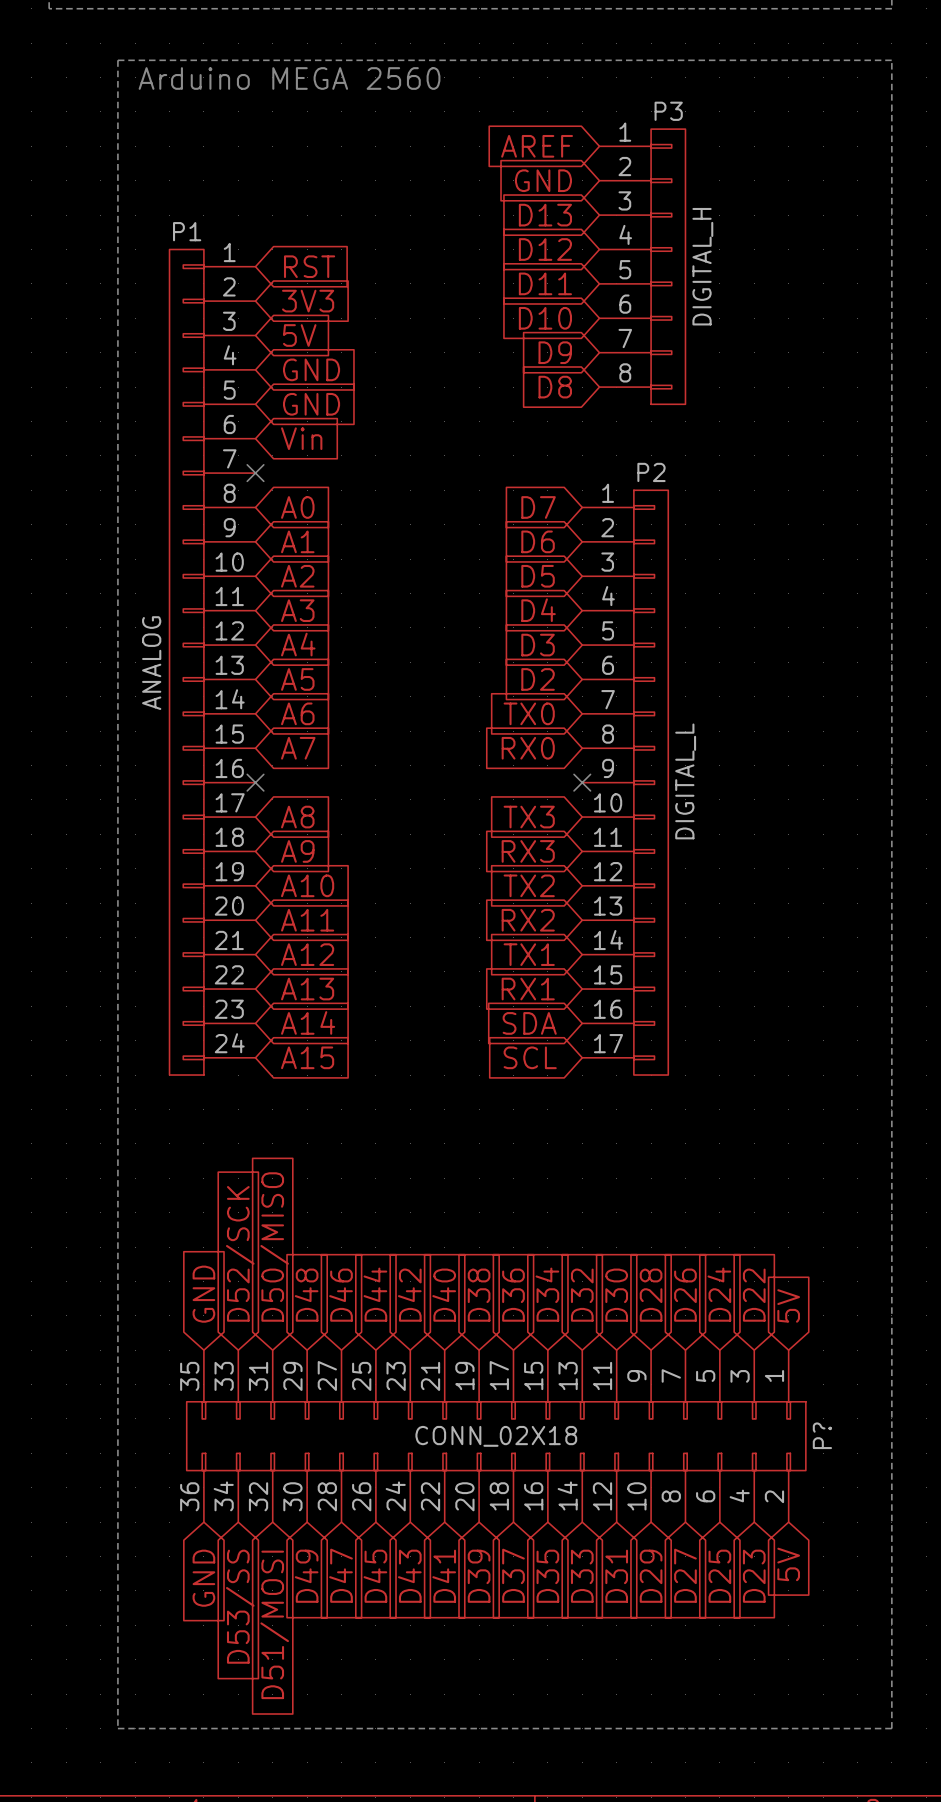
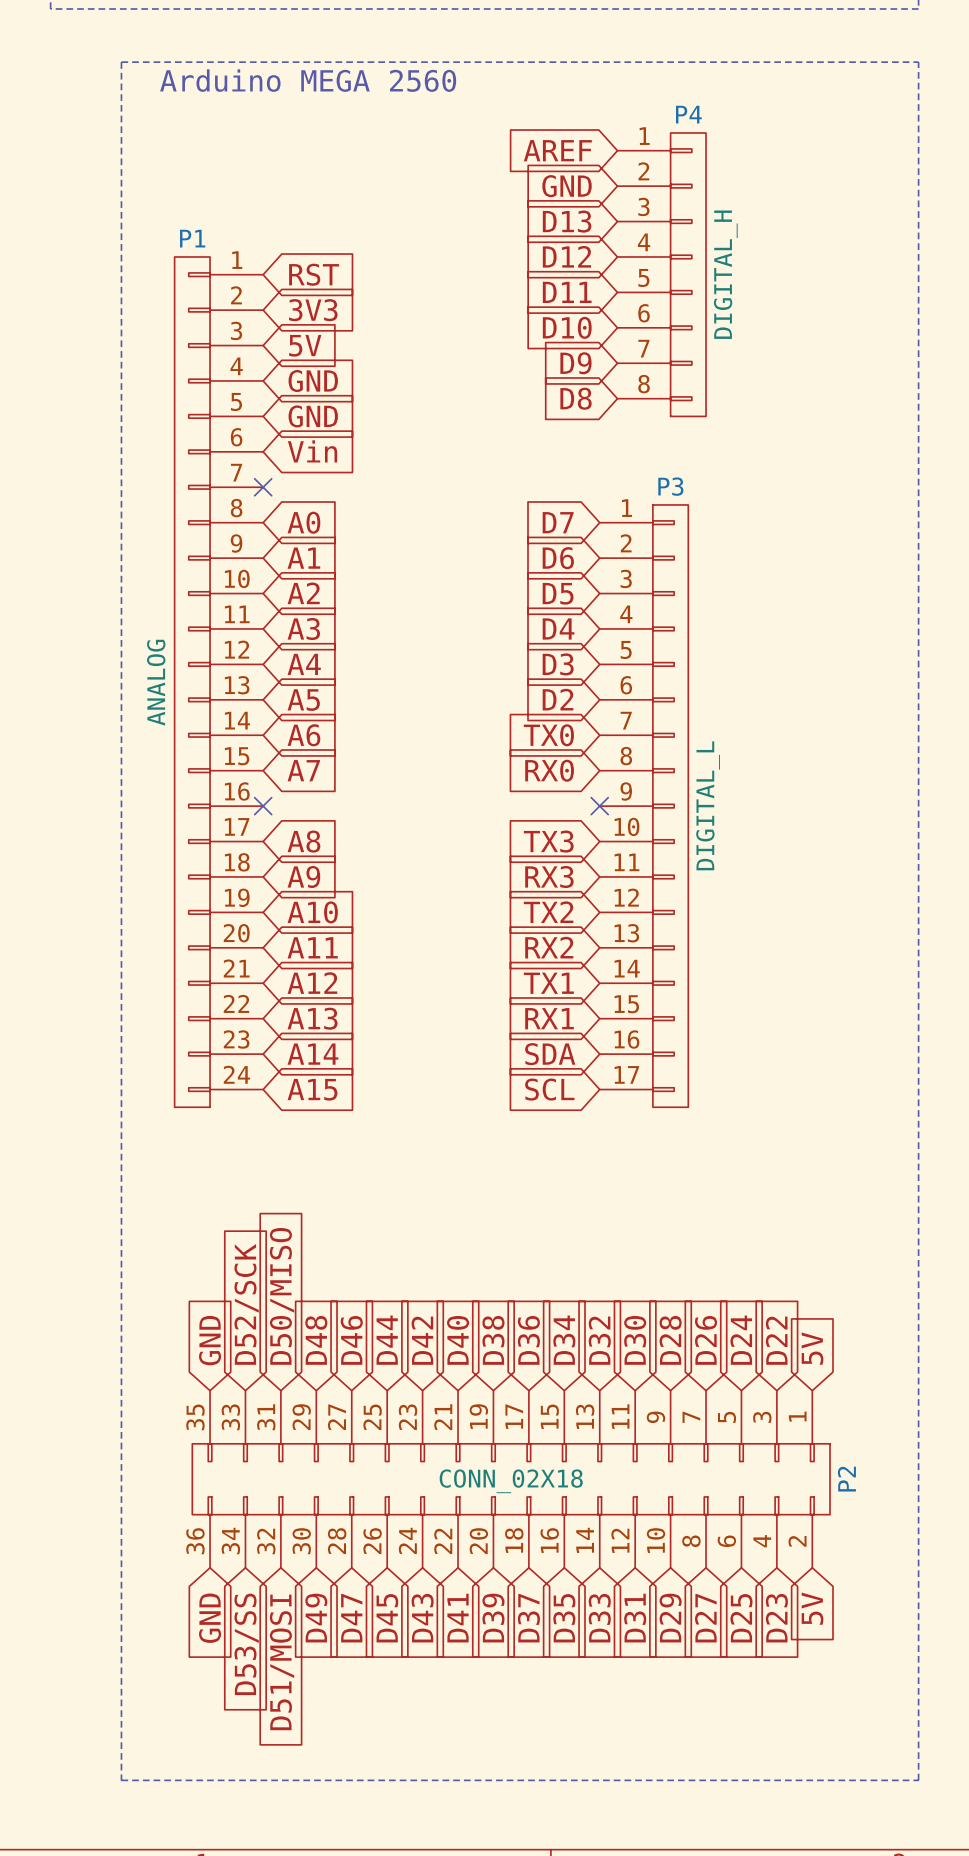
P3 name: P3 (668, 111) -> P4 (688, 114)
P2 name: P2 (651, 472) -> P3 (670, 486)
P? name: P? (822, 1435) -> P2 (846, 1479)

